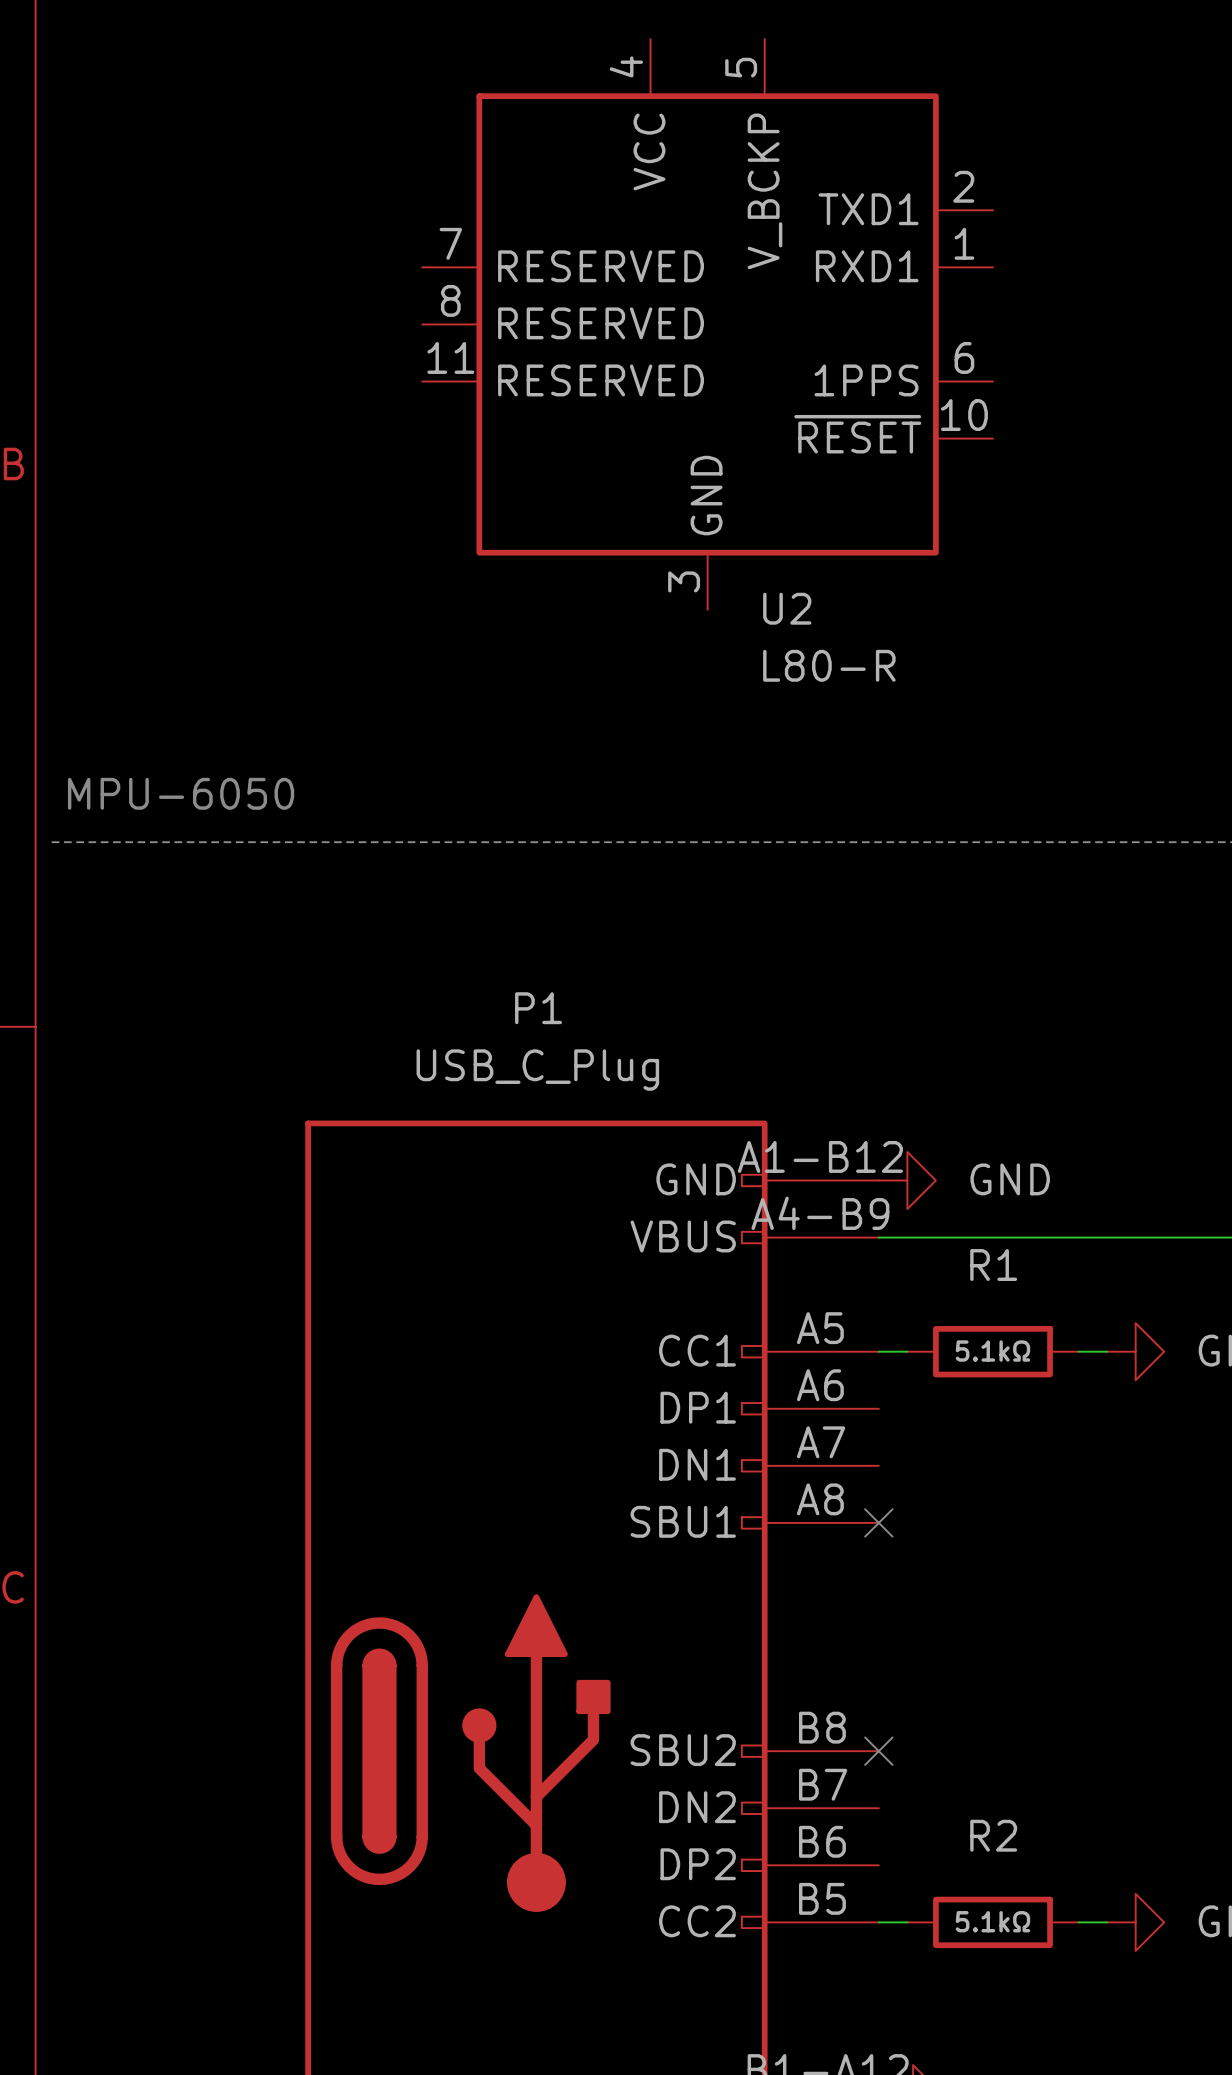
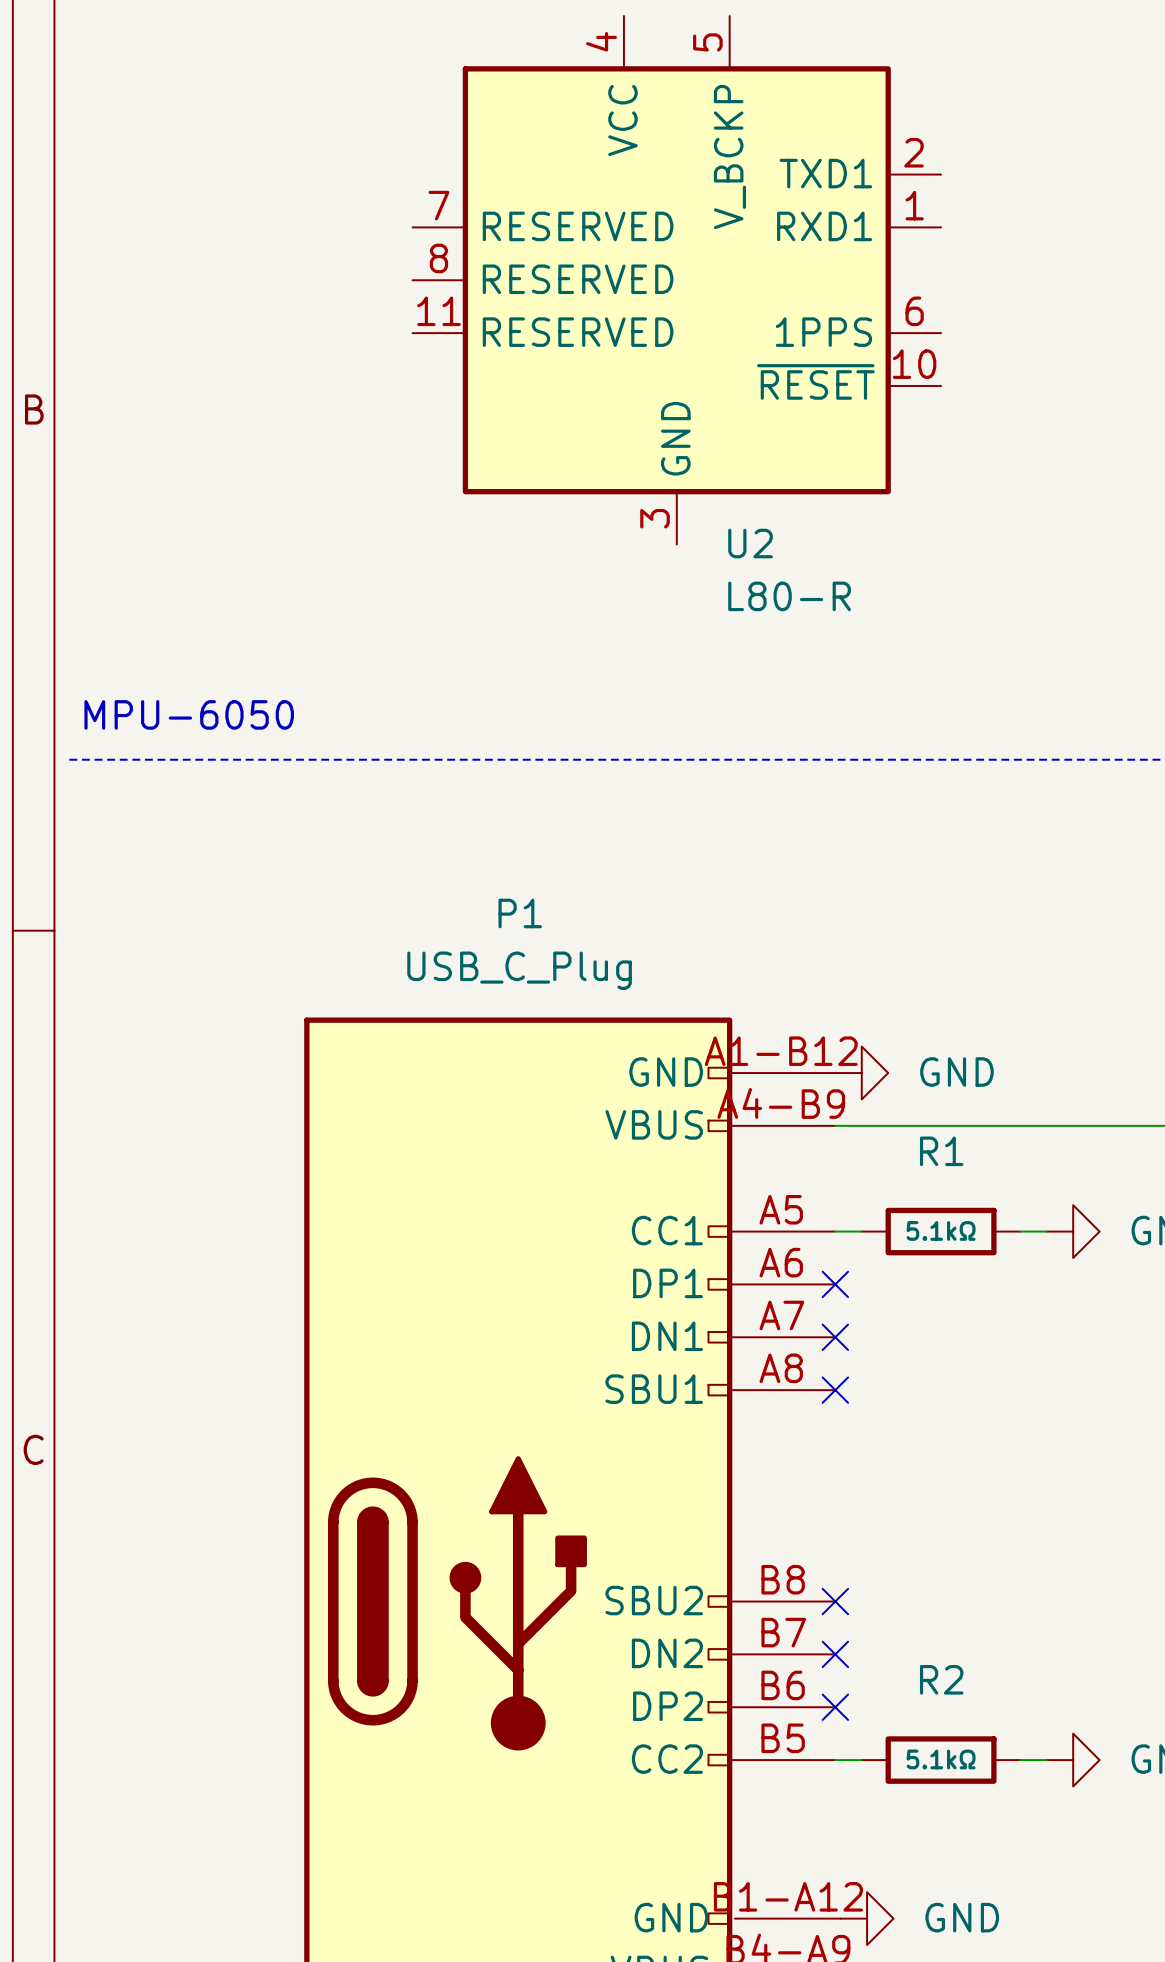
no-connect mark: none -> (835, 1284)
no-connect mark: none -> (835, 1337)
no-connect mark: none -> (835, 1654)
no-connect mark: none -> (835, 1707)

